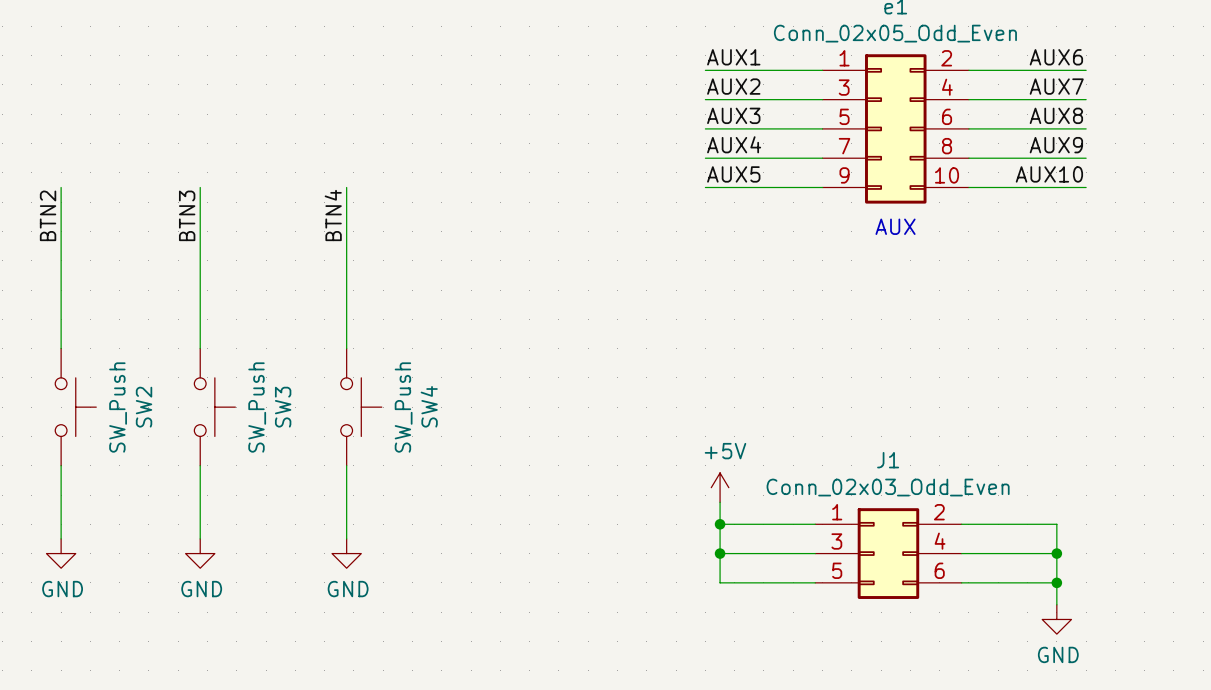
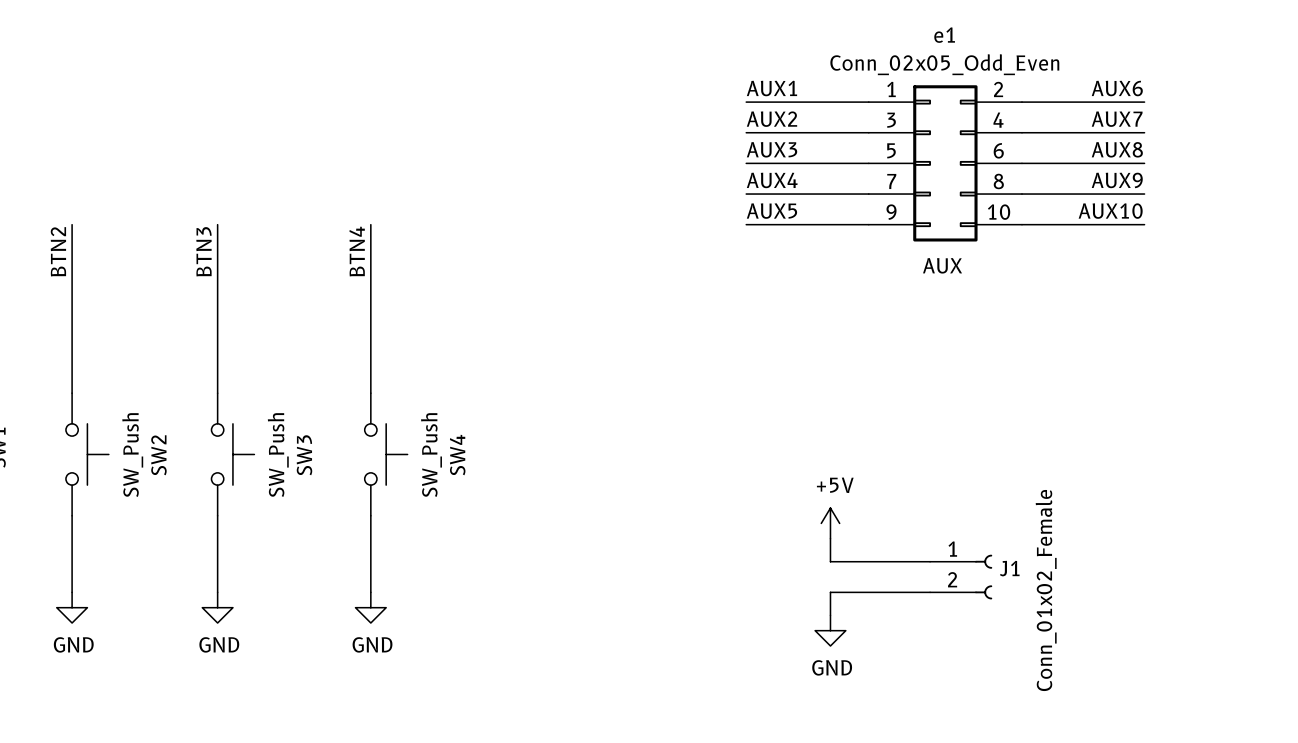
J1 name position: J1 (888, 460) -> J1 (1009, 568)
power symbol position: +5V (720, 487) -> +5V (830, 523)
wire: none -> (830, 538) (830, 561) (930, 561)
J1 value: Conn_02x03_Odd_Even (888, 487) -> Conn_01x02_Female (1046, 590)
wire: (720, 502) (720, 582) (815, 582) -> none
J1 symbol: [815, 508, 962, 599] -> [930, 554, 993, 600]
wire: (720, 524) (815, 524) -> none
junction: (720, 524) -> none
wire: (961, 524) (1056, 524) (1056, 604) -> none
wire: none -> (930, 592) (830, 592) (830, 615)
wire: (720, 553) (815, 553) -> none
junction: (720, 553) -> none
wire: (961, 553) (1056, 553) -> none
junction: (1056, 553) -> none
wire: (961, 582) (1056, 582) -> none
junction: (1056, 582) -> none
power symbol position: GND (1056, 619) -> GND (830, 630)

